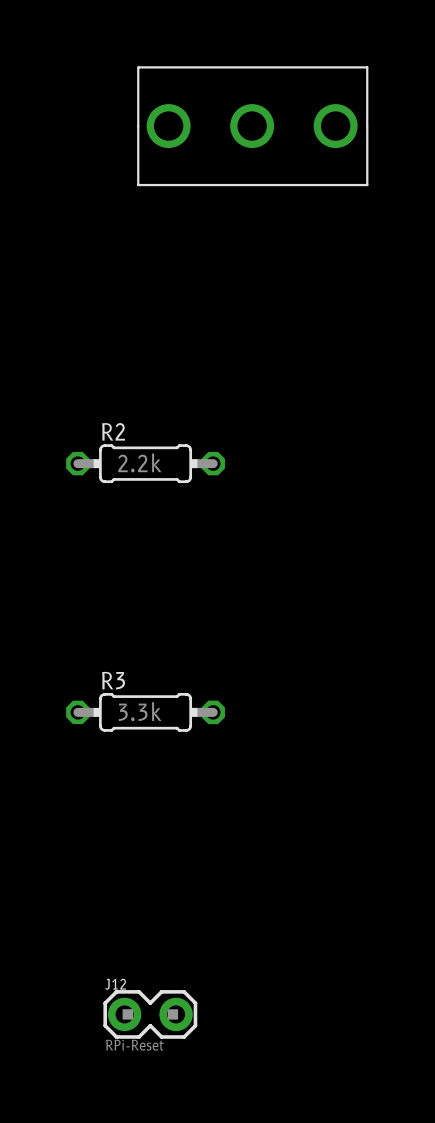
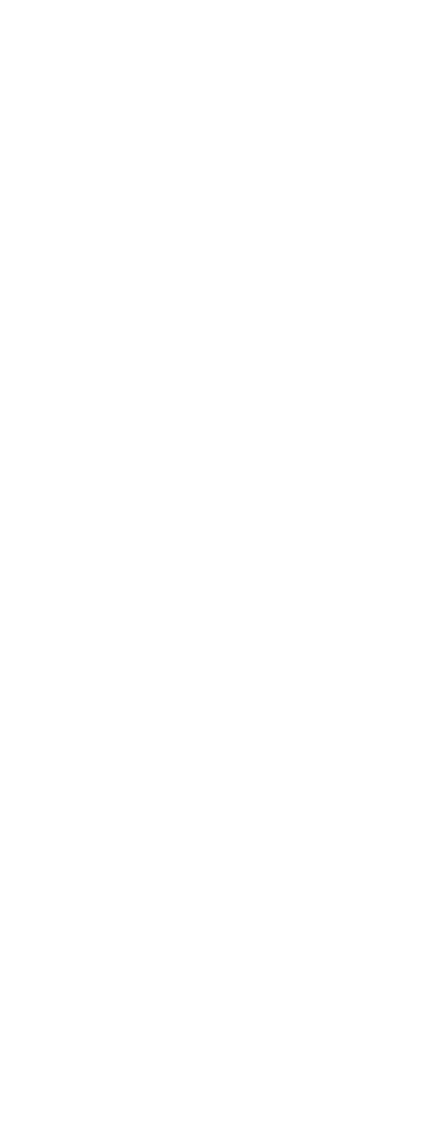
part: (252, 126) -> none
R2: 2.2k (145, 463) -> none
R3: 3.3k (145, 712) -> none
J12: RPi-Reset (150, 1014) -> none

